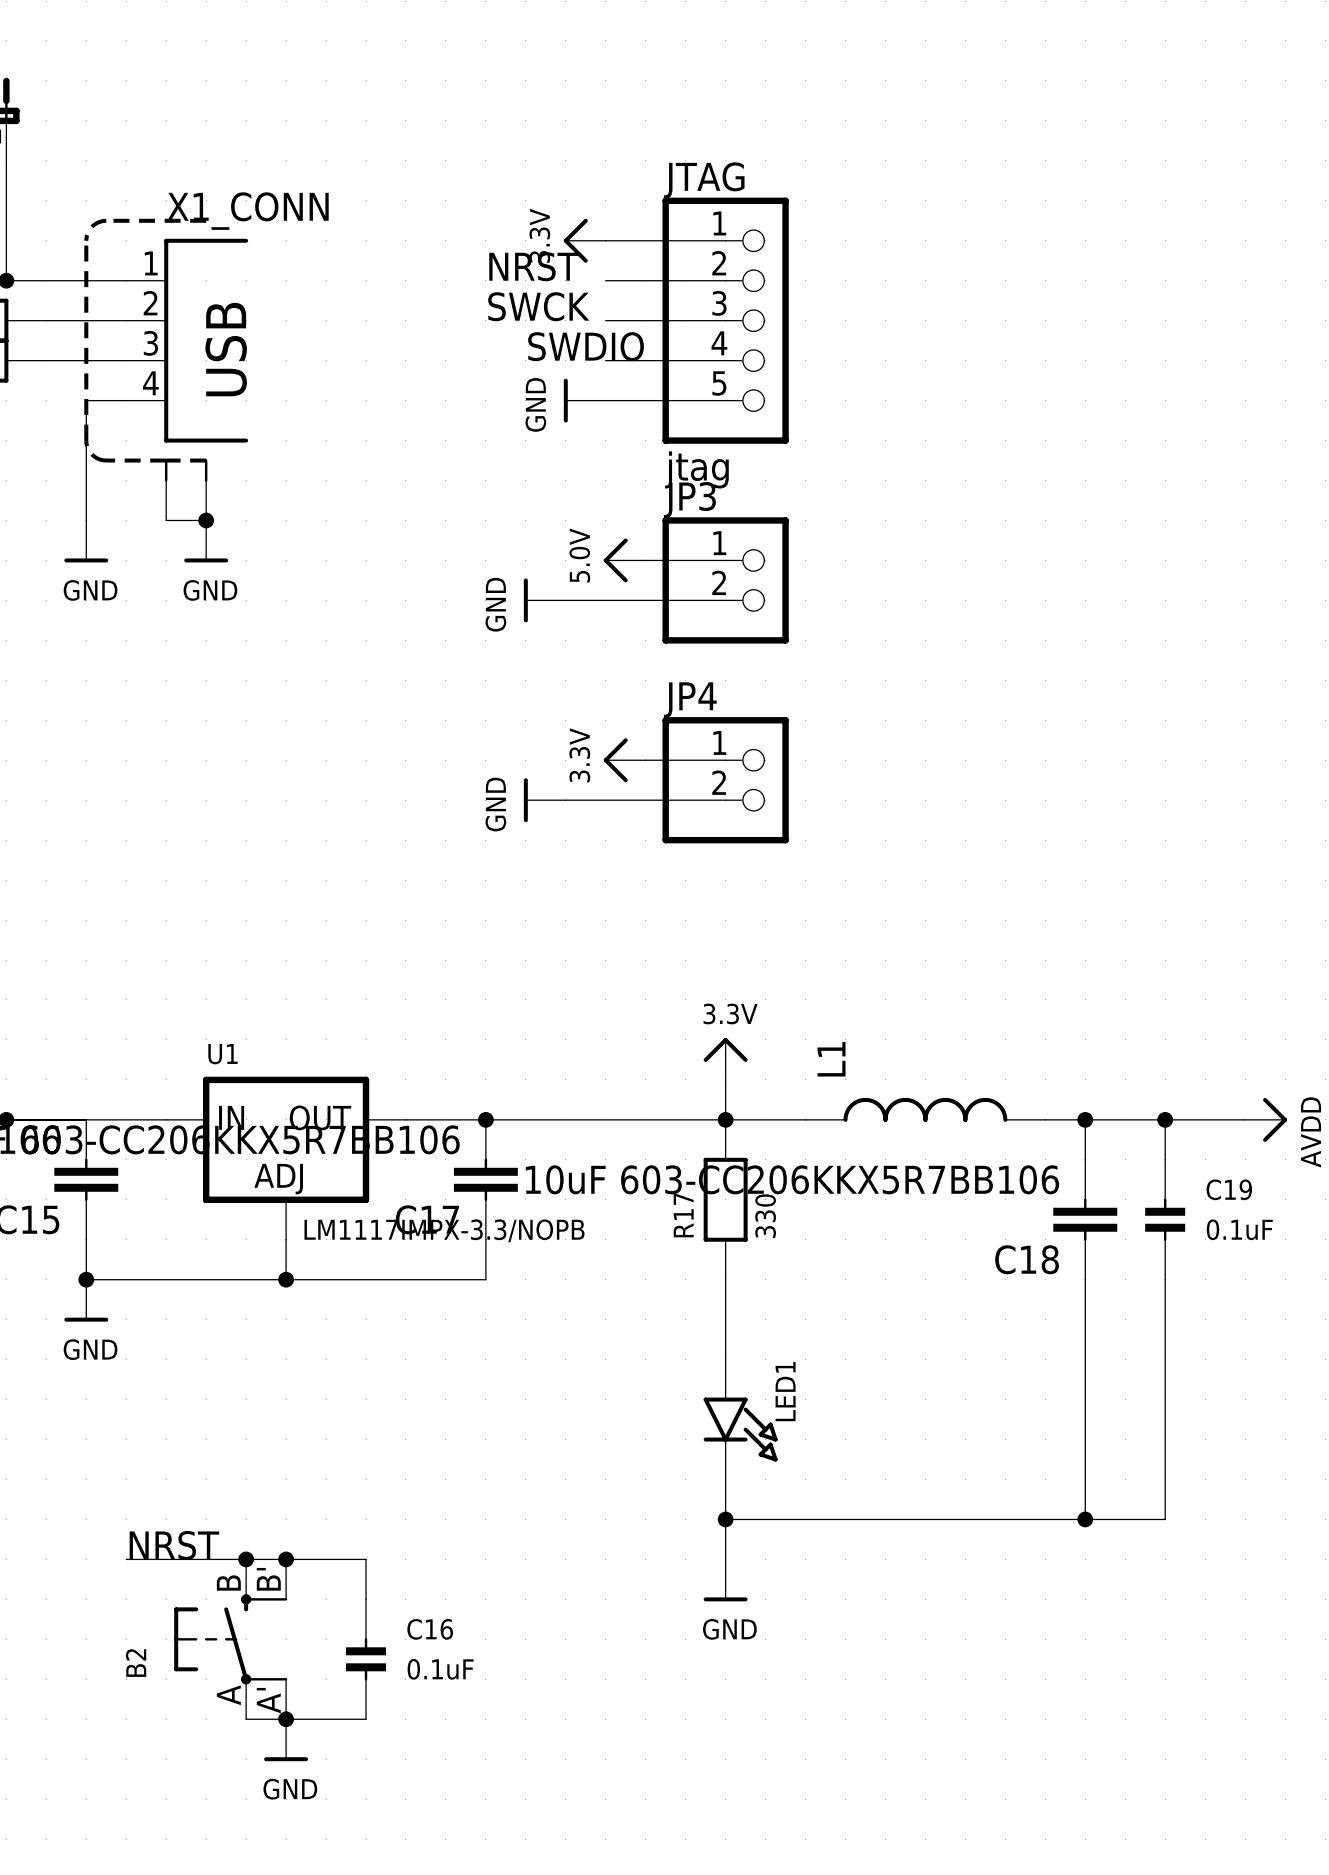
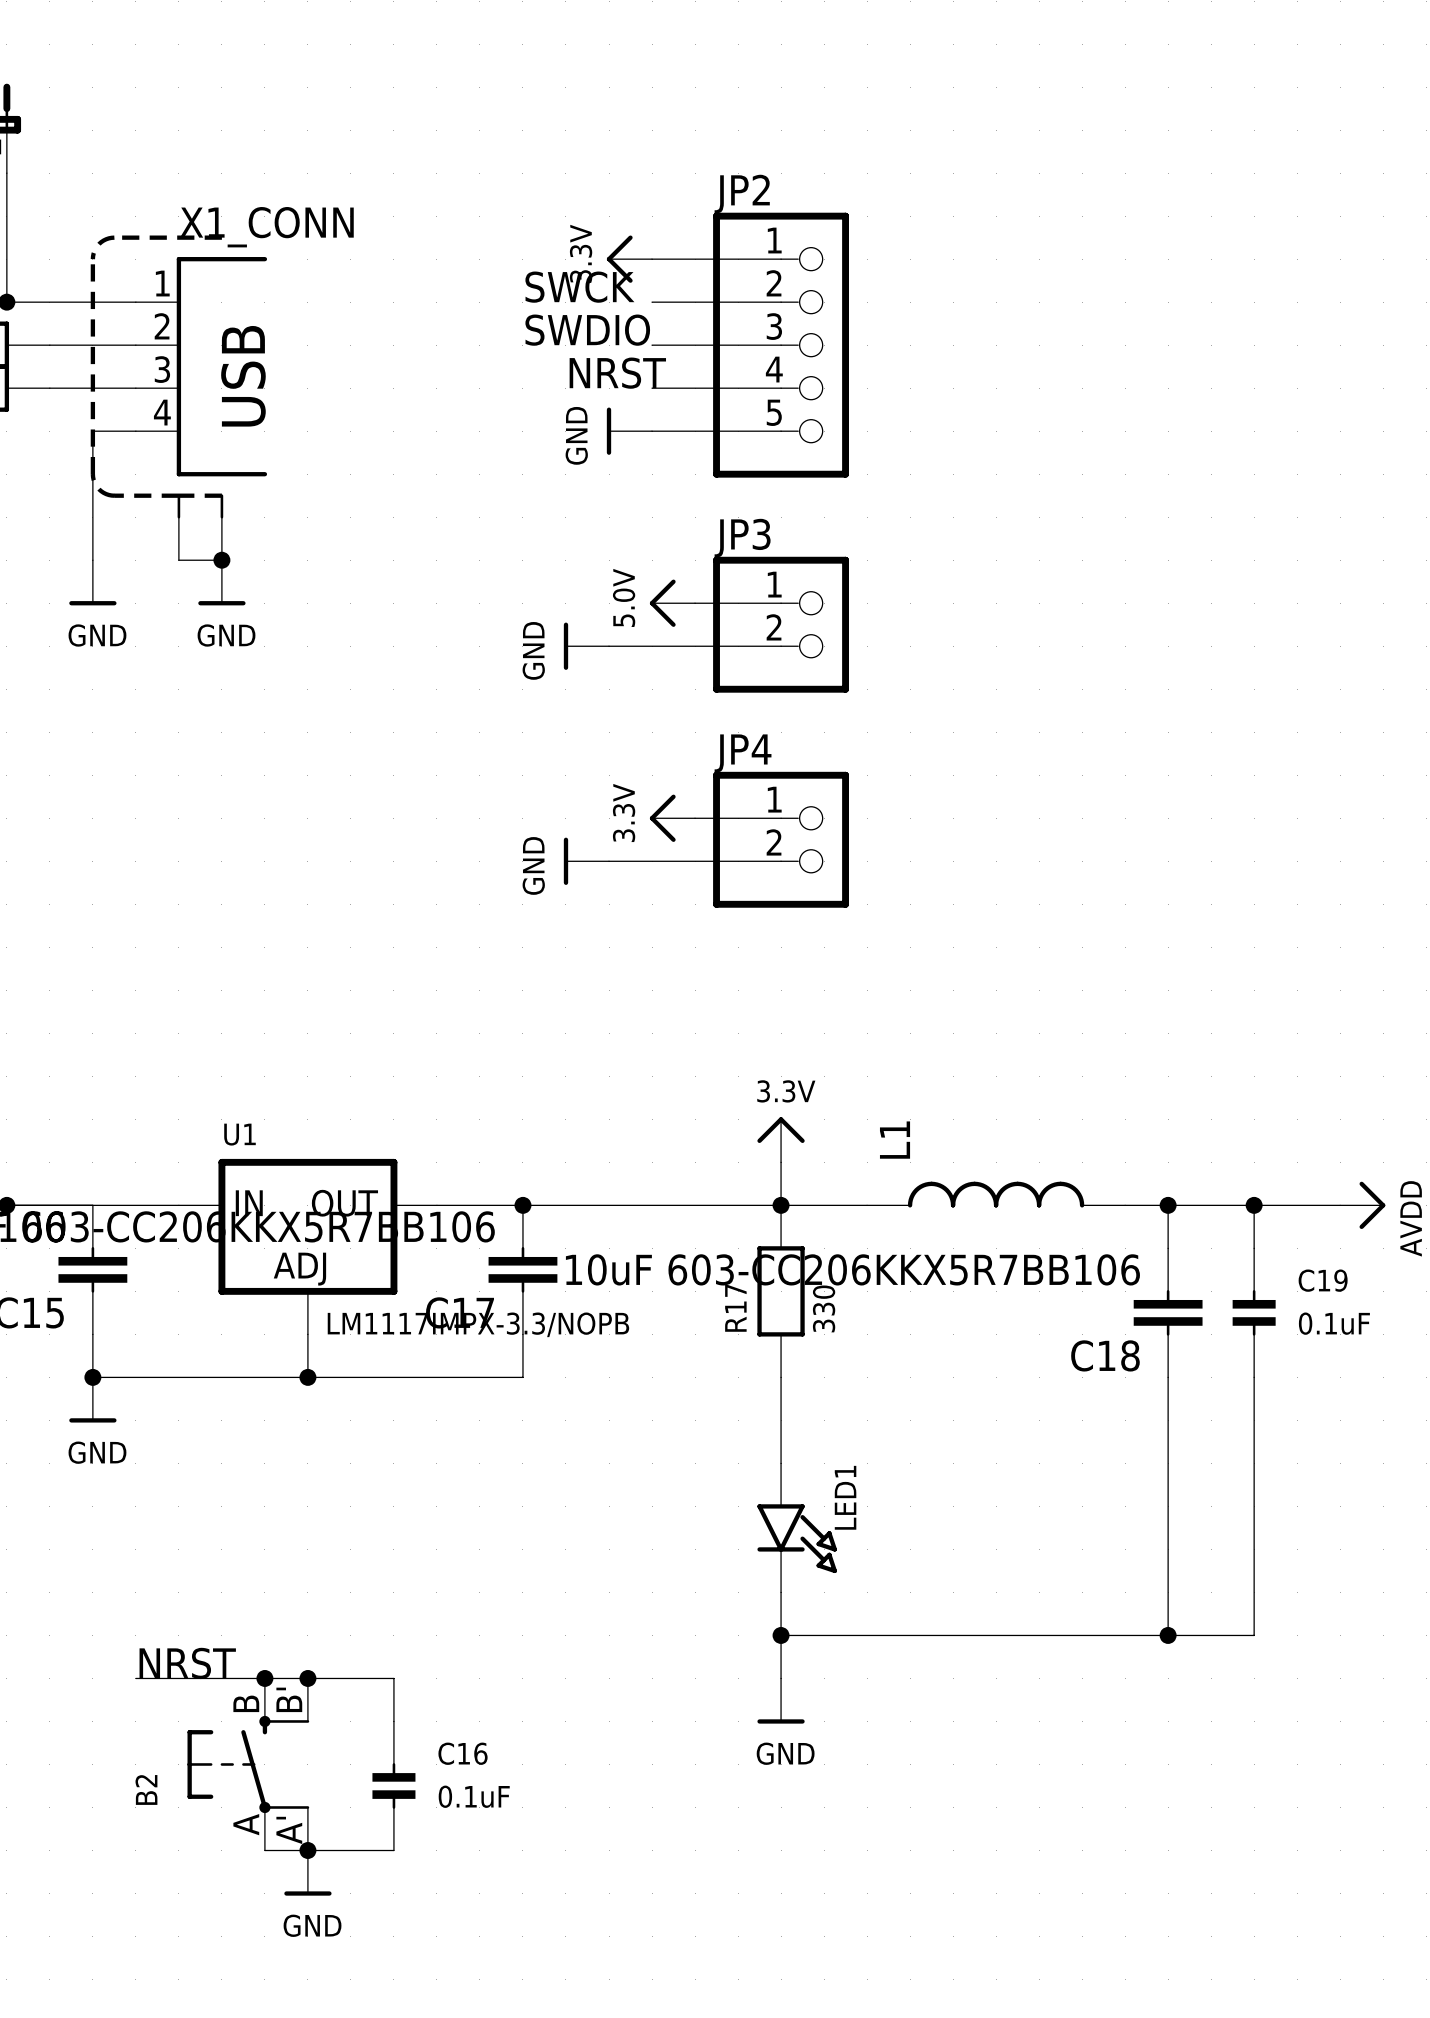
JTAG name: JTAG (704, 180) -> JP2 (742, 194)
label: NRST (534, 266) -> SWCK (579, 287)
label: SWCK (538, 306) -> SWDIO (587, 330)
label: SWDIO (586, 346) -> NRST (617, 373)
JTAG value: jtag (696, 469) -> none

